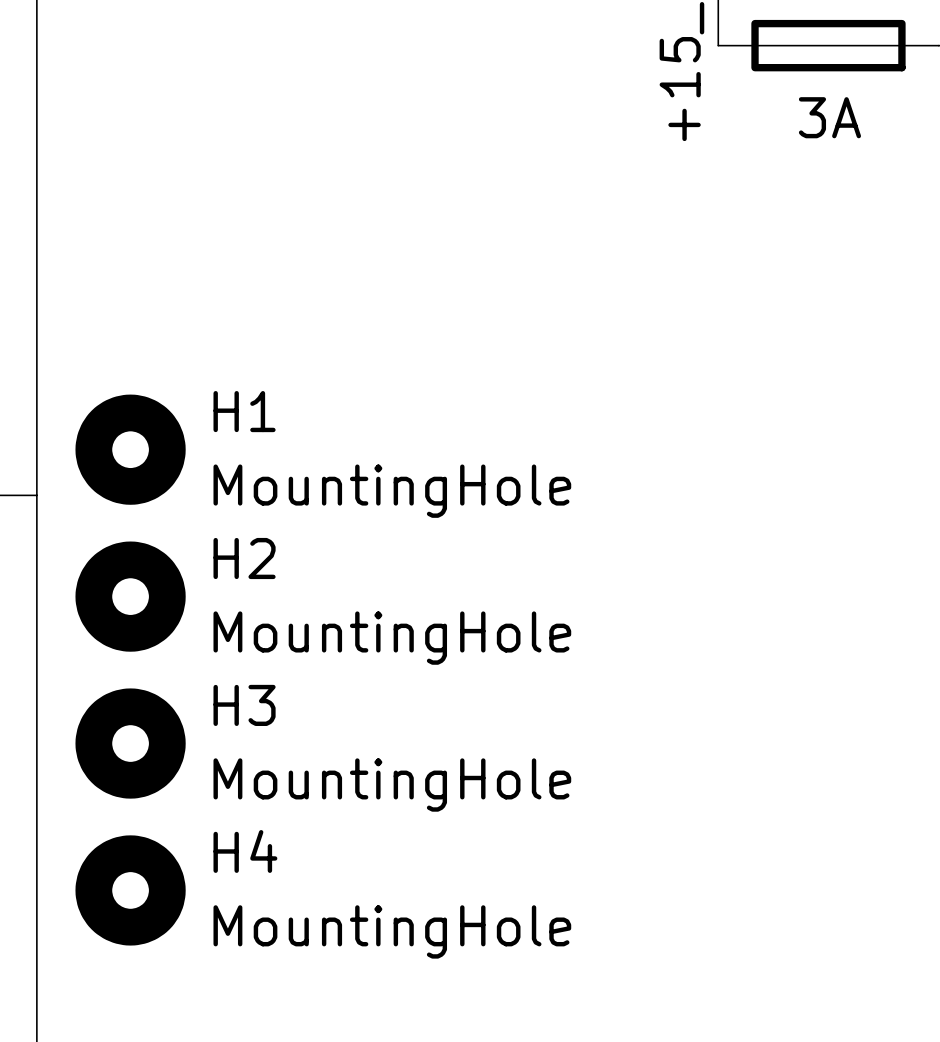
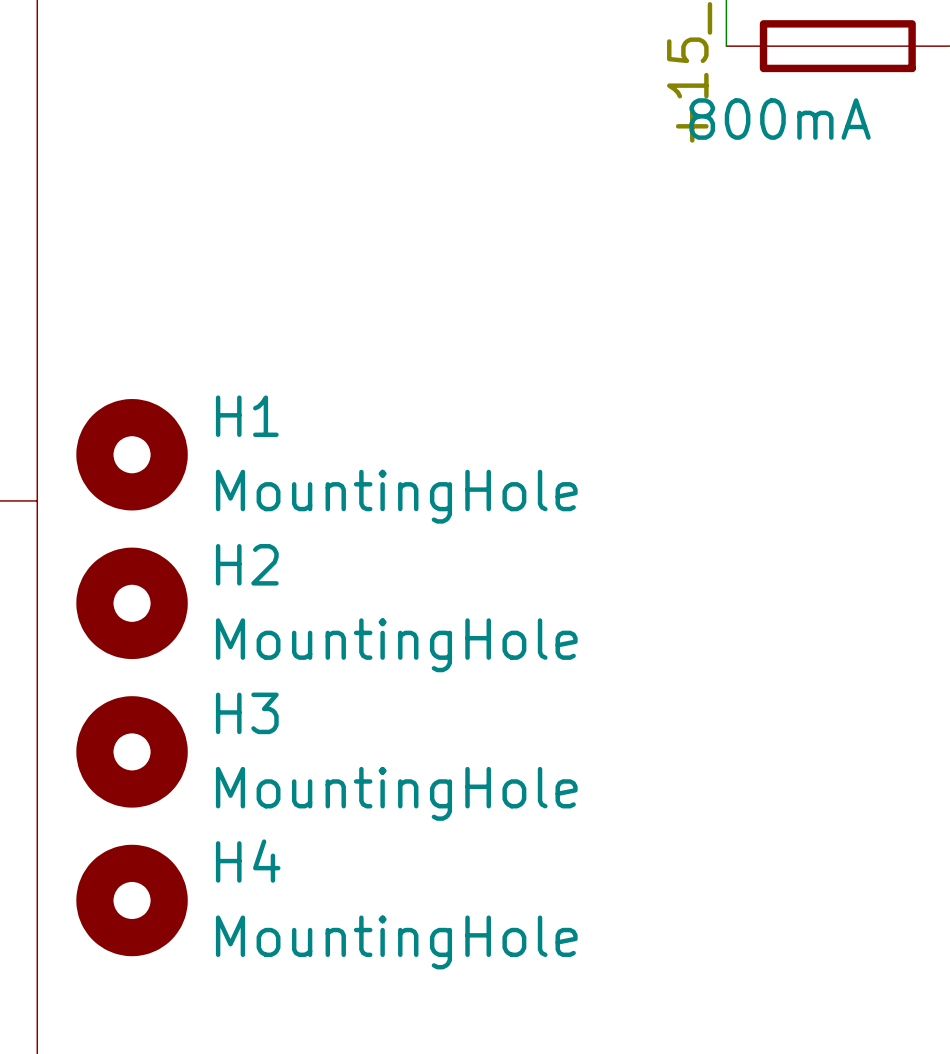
part value: 3A (829, 117) -> 800mA (780, 119)

